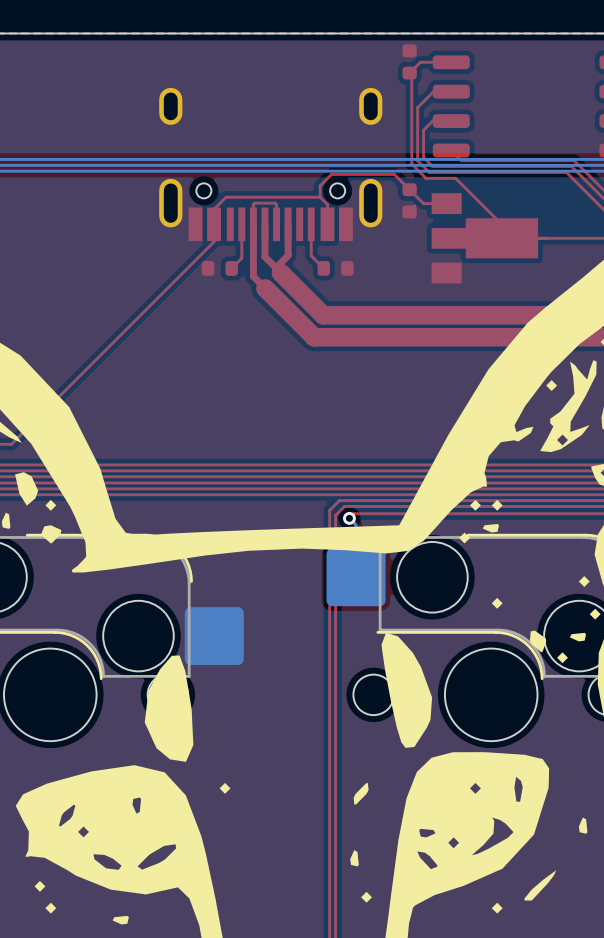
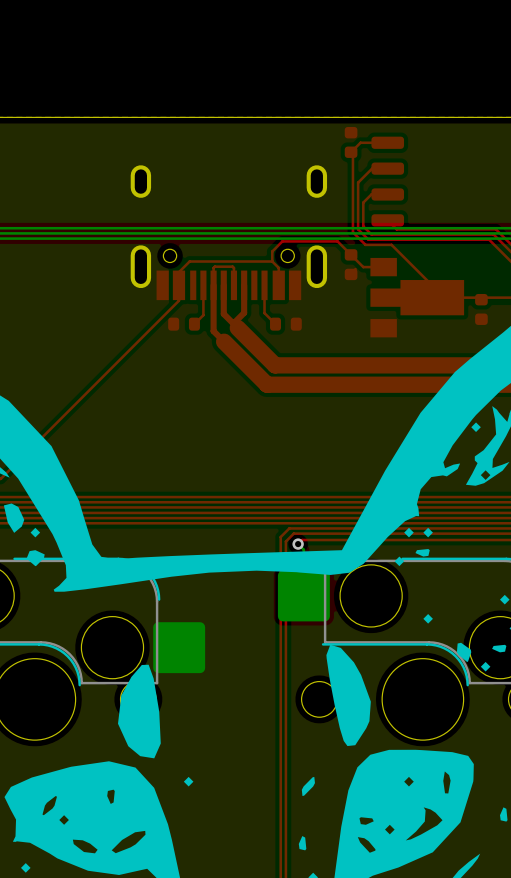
part: none -> (481, 309)

